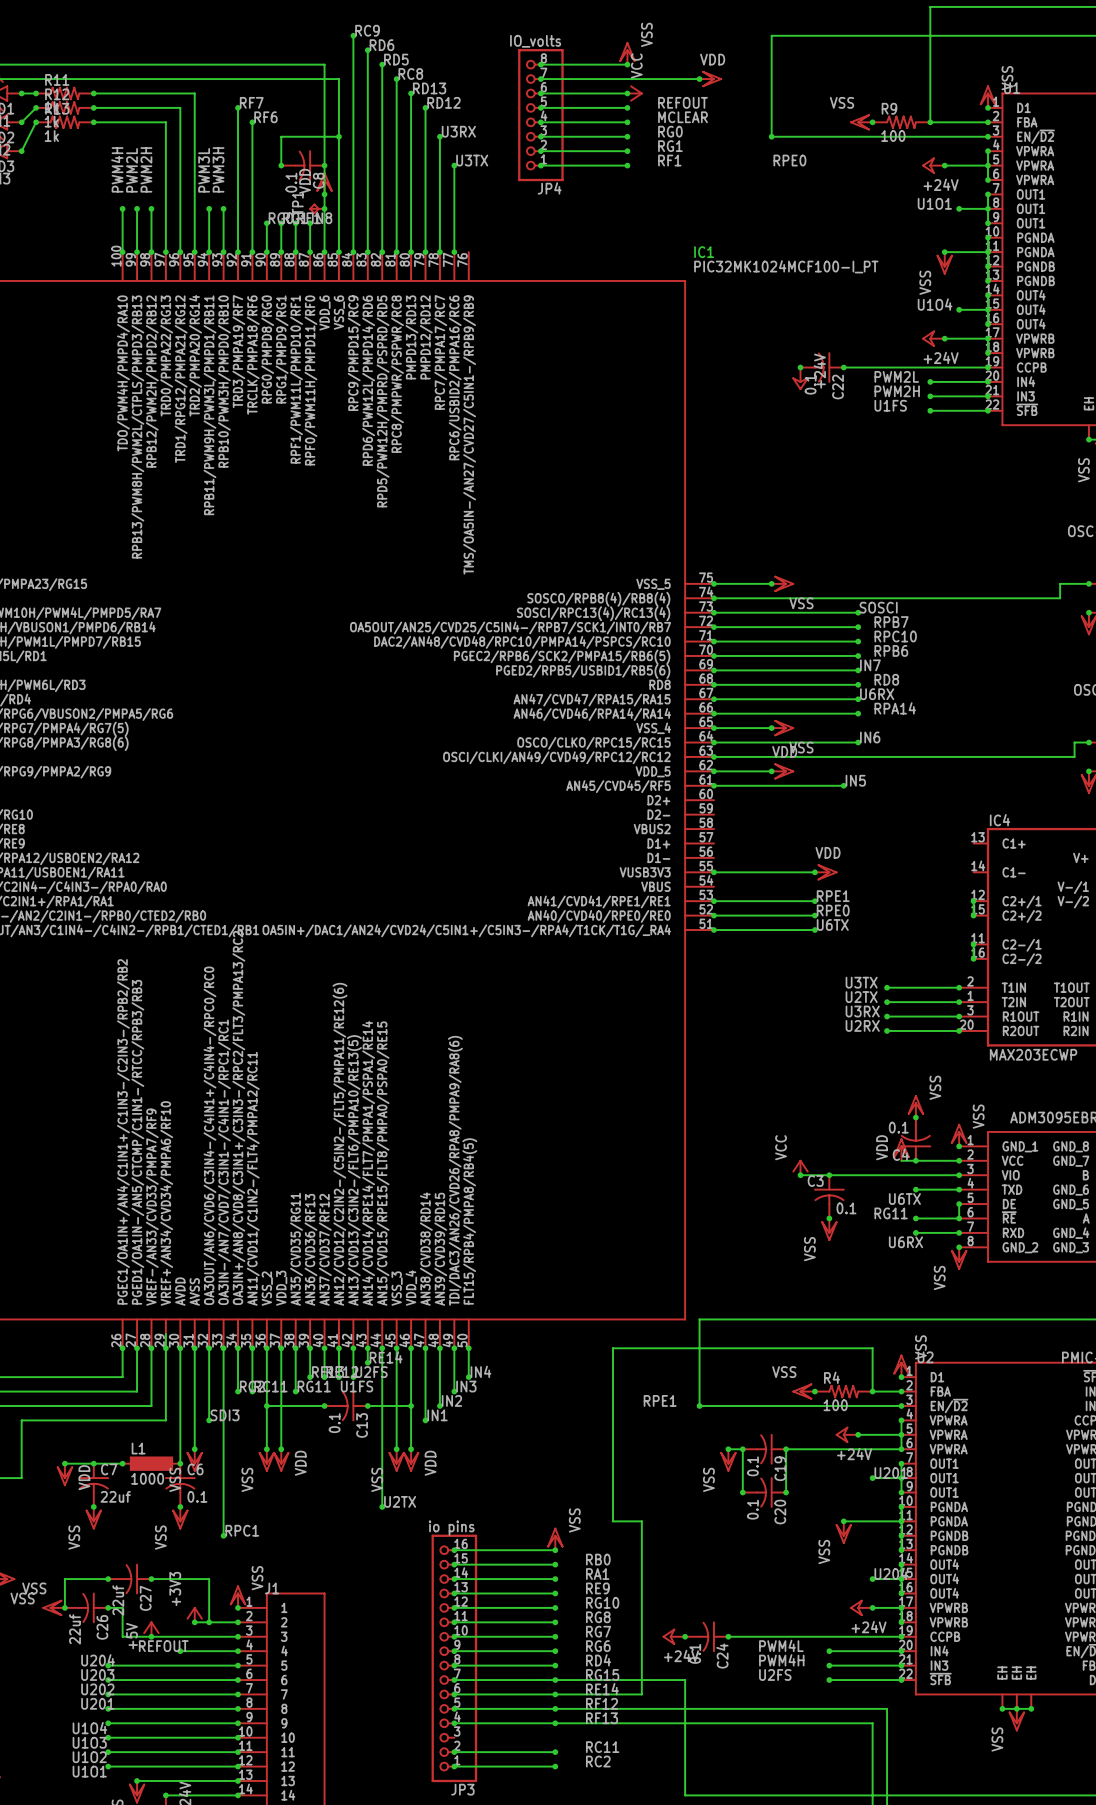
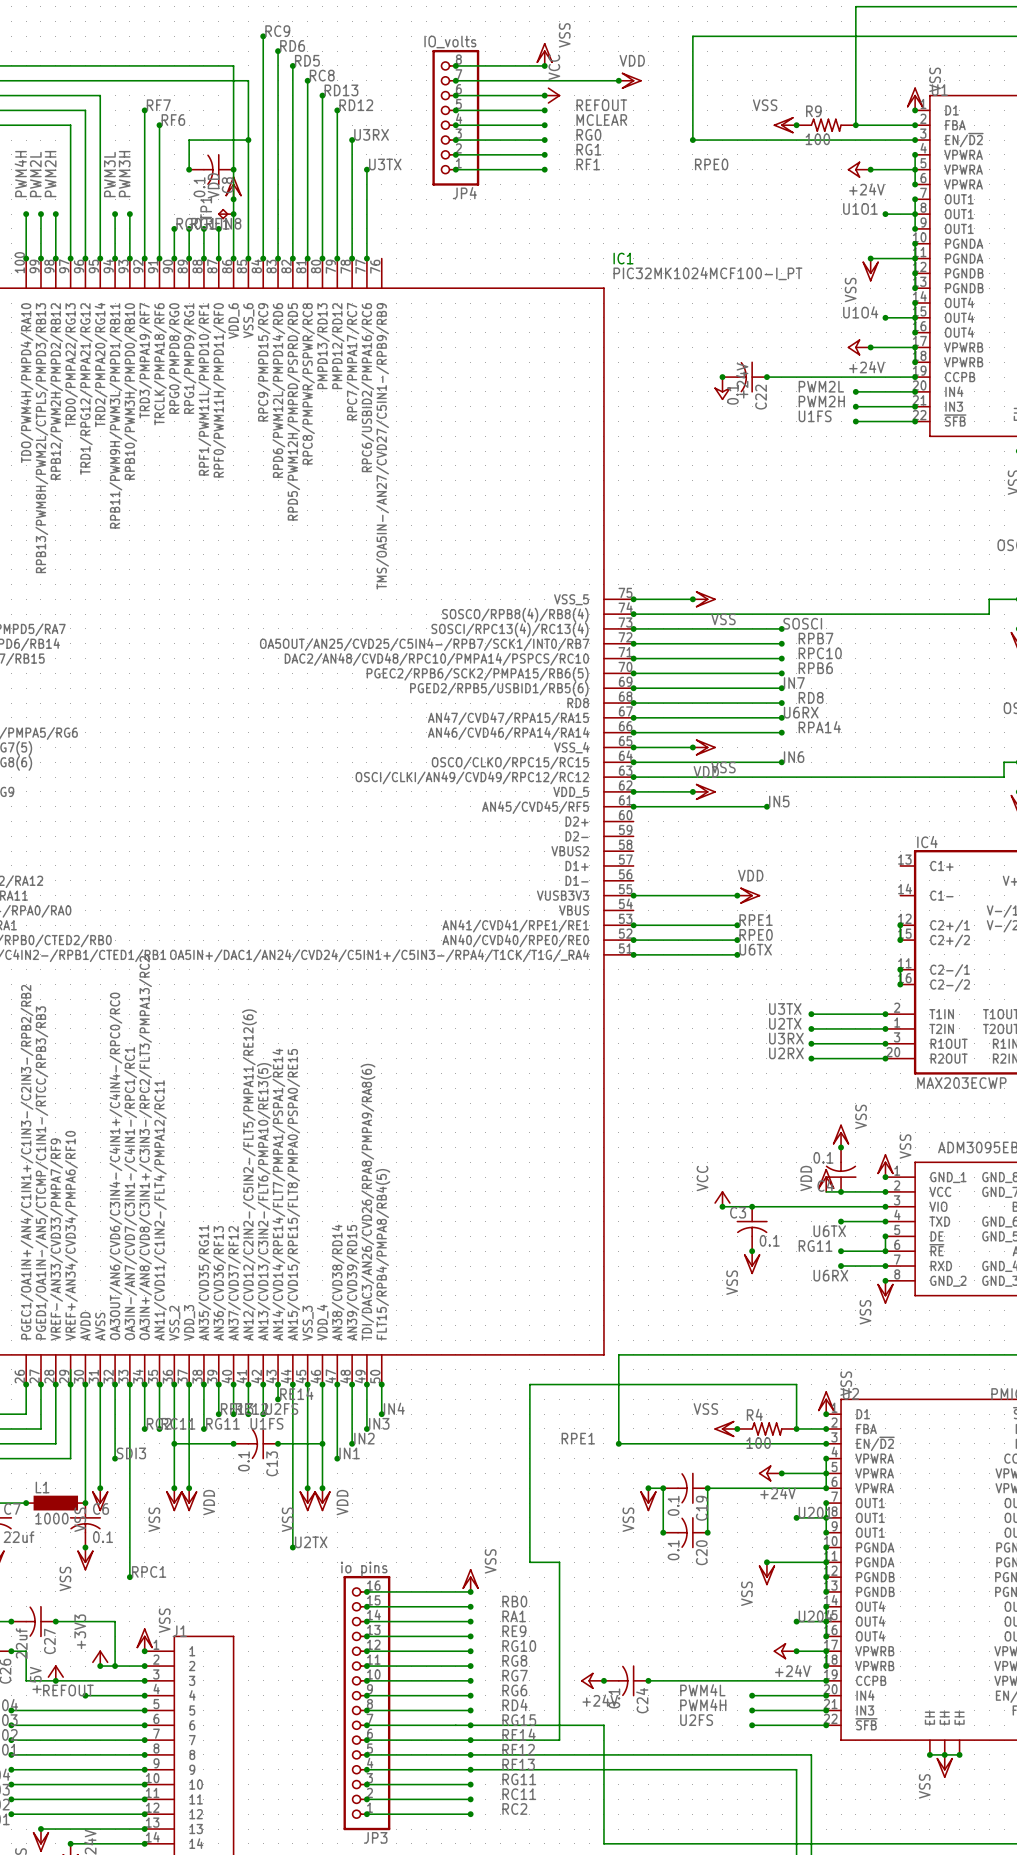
label: none -> RG11 (519, 1779)
wire: none -> (366, 1784) (470, 1784)
junction: none -> (366, 1784)
junction: none -> (470, 1784)

